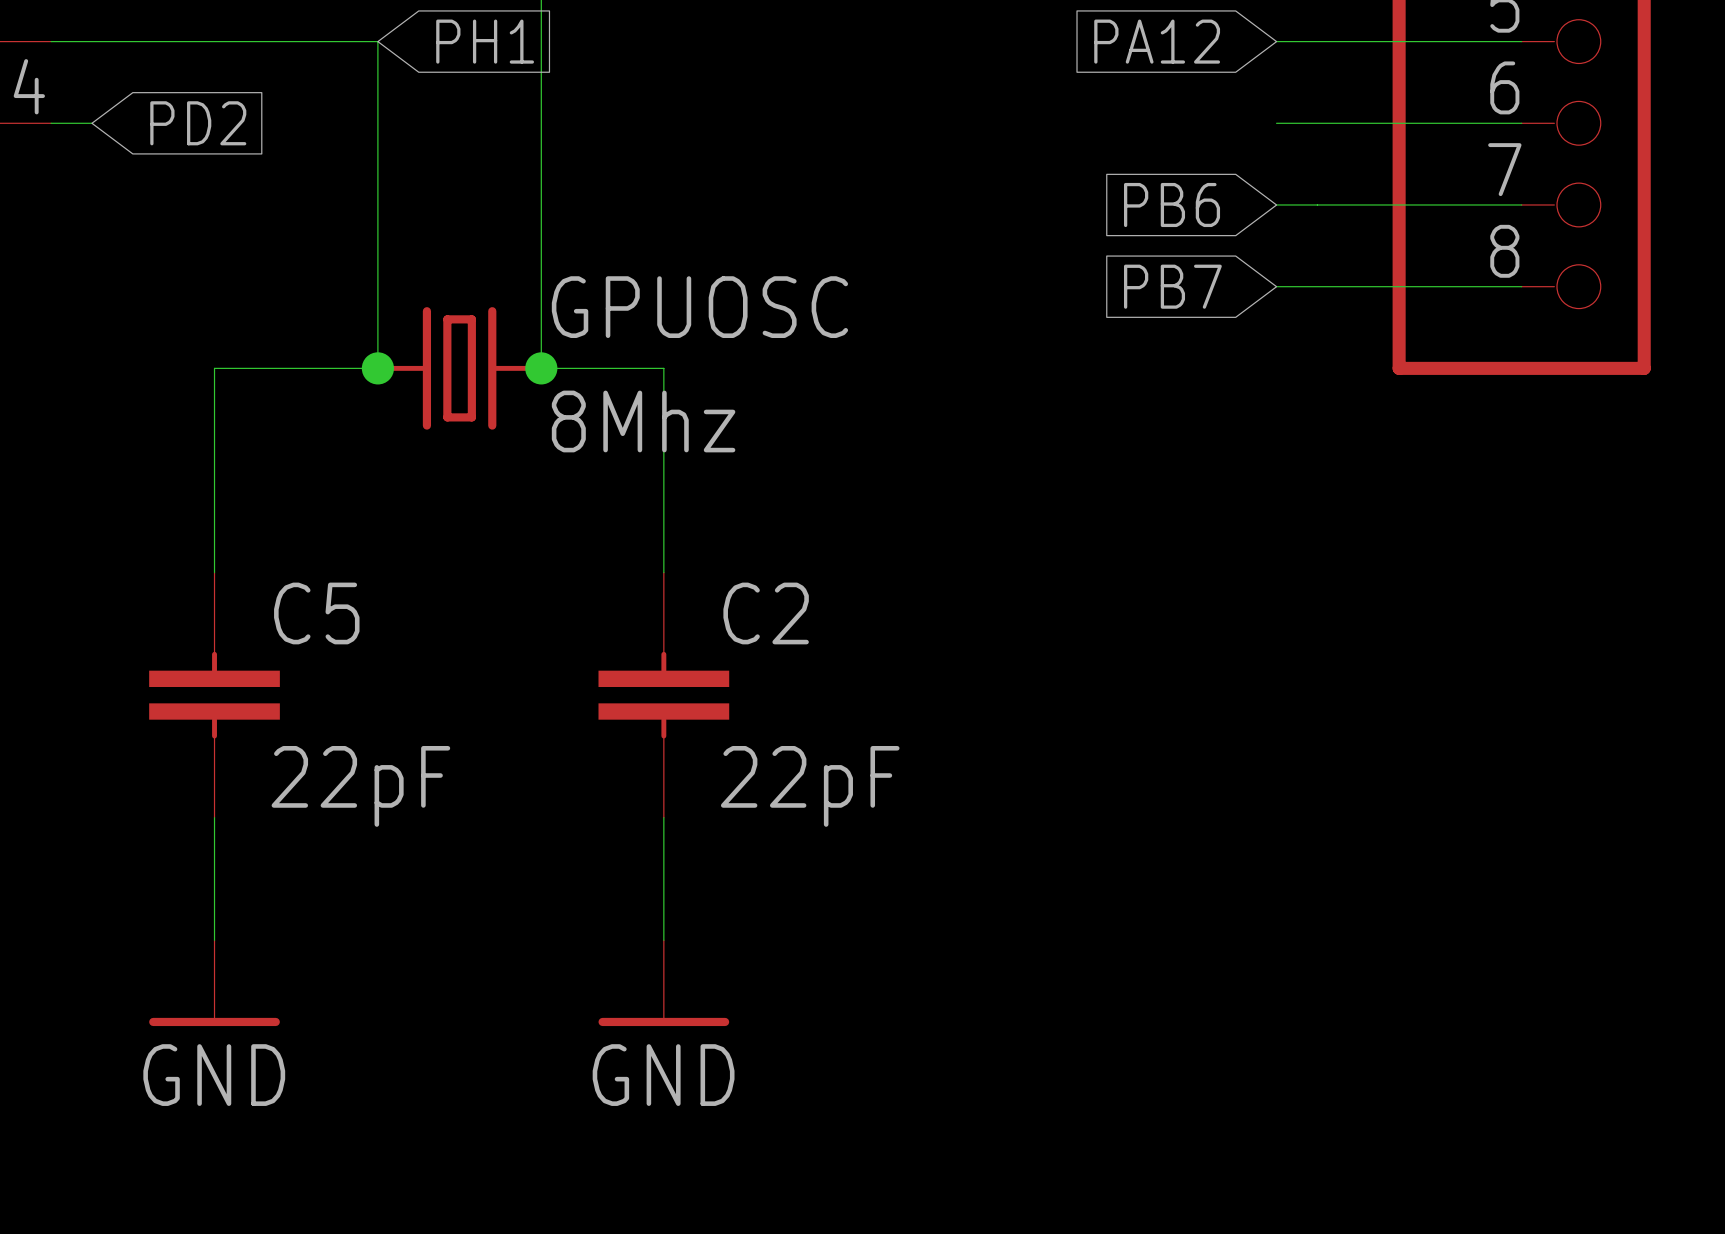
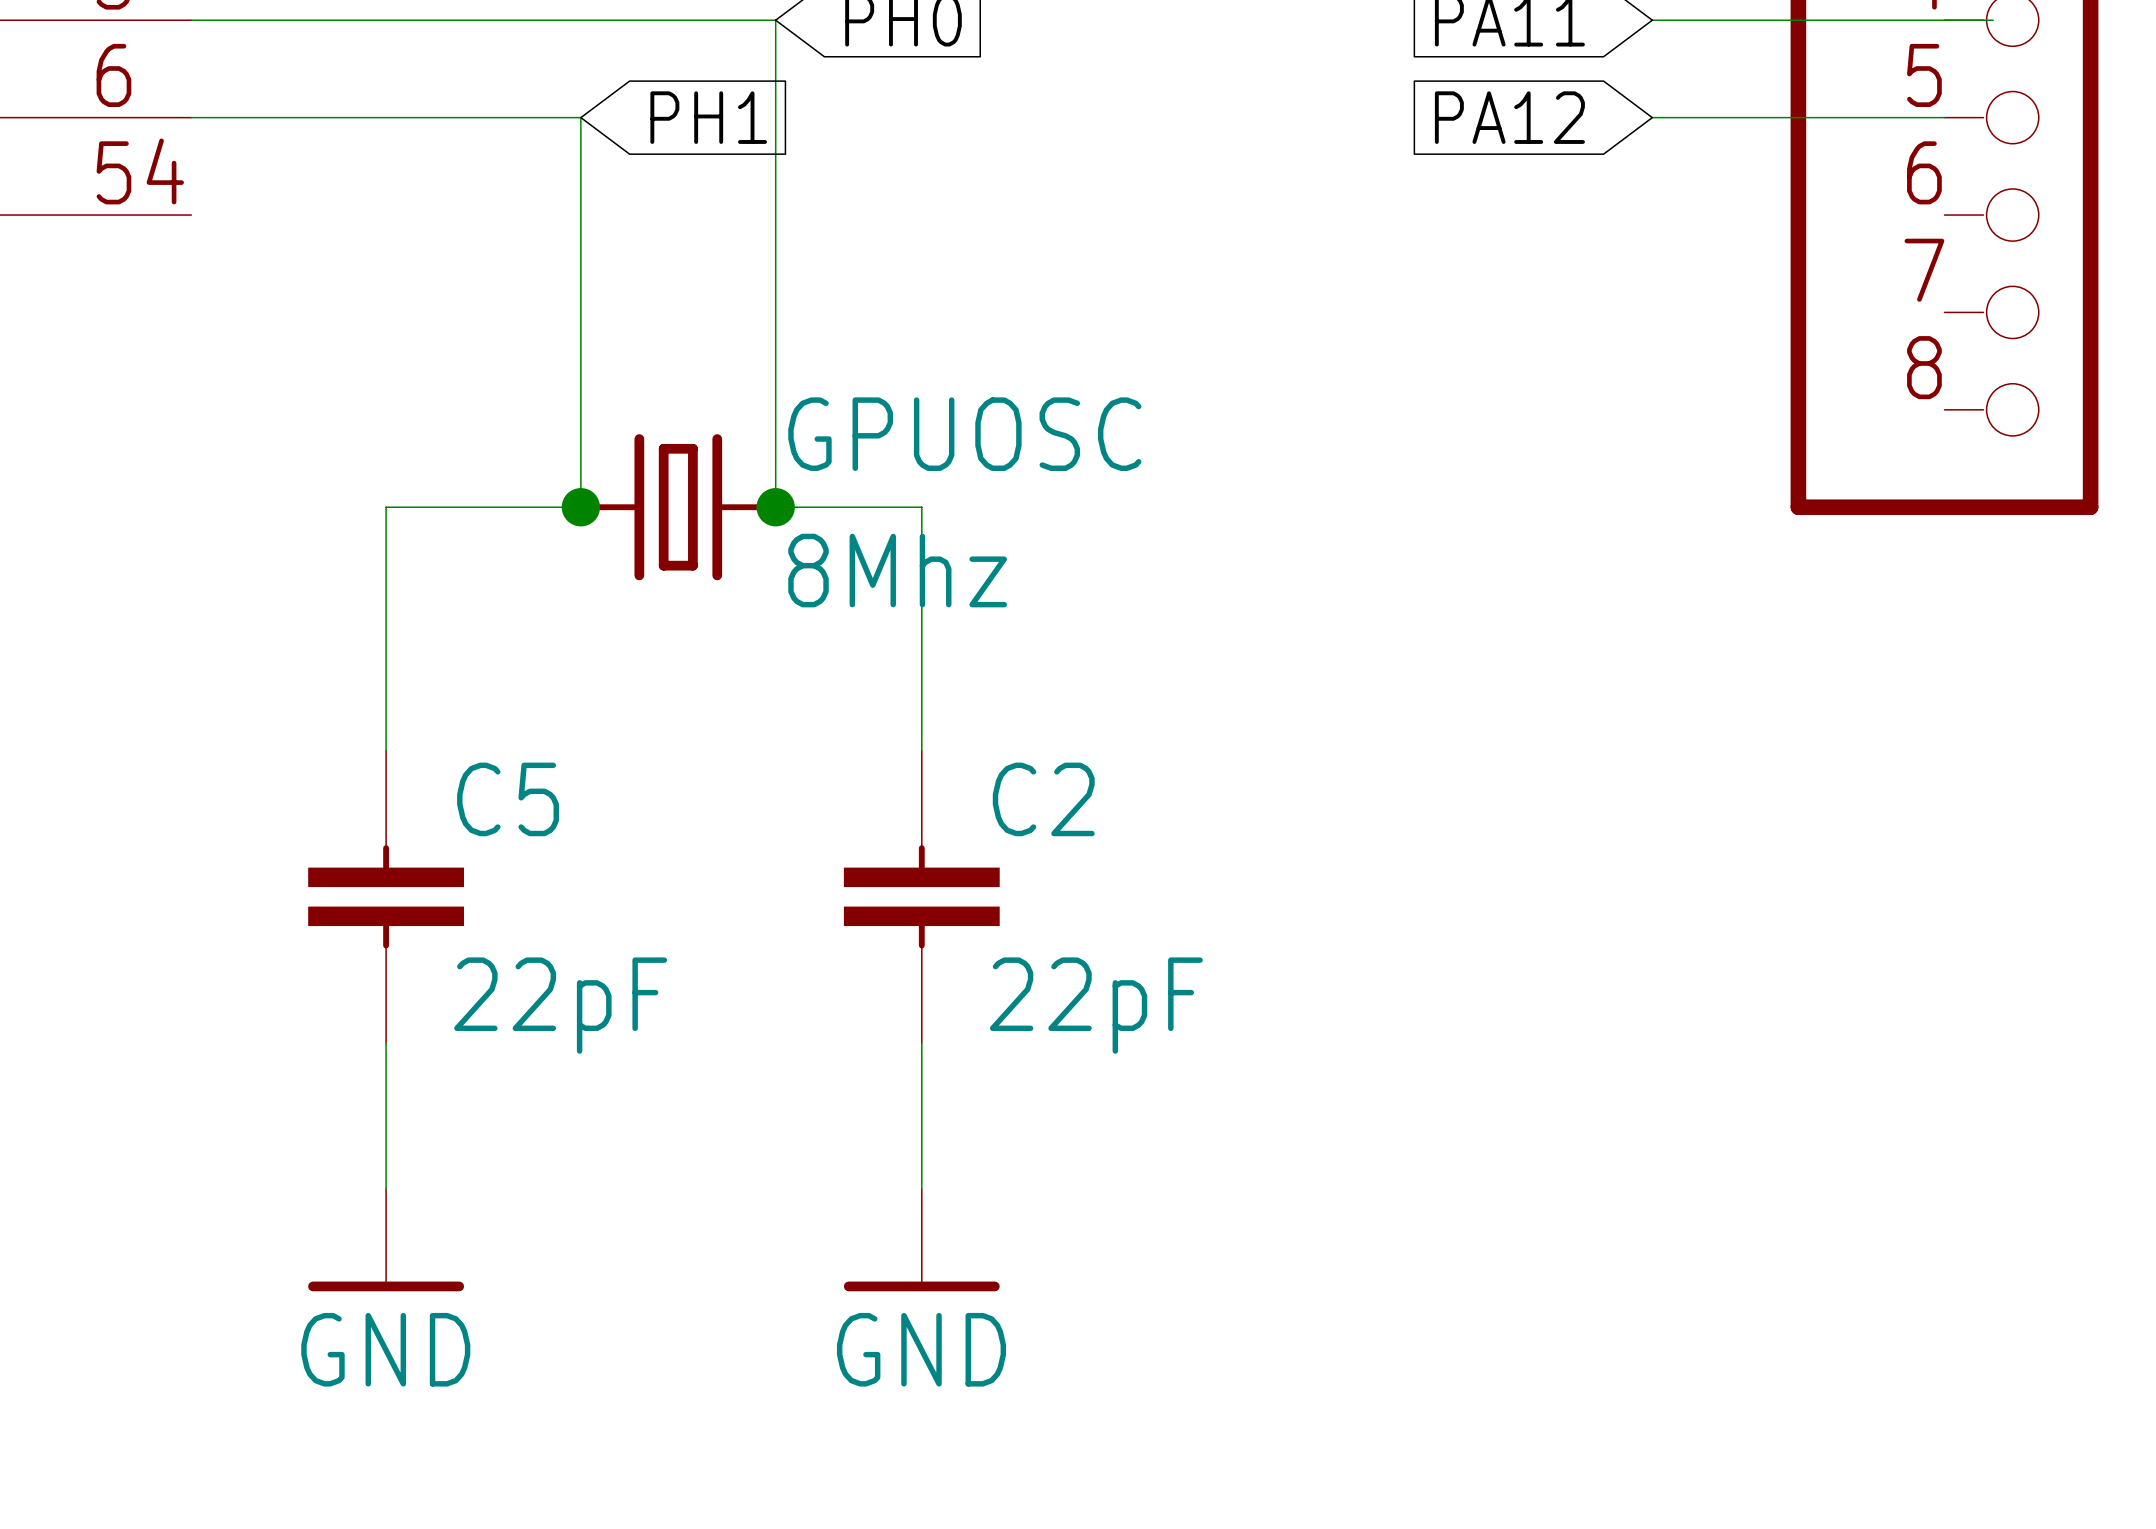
wire: (51, 123) (91, 123) -> none
global label: PD2 (198, 123) -> none
wire: (1276, 123) (1521, 123) -> none
global label: PB6 (1172, 204) -> none
wire: (1276, 204) (1521, 204) -> none
global label: PB7 (1172, 286) -> none
wire: (1276, 286) (1521, 286) -> none

